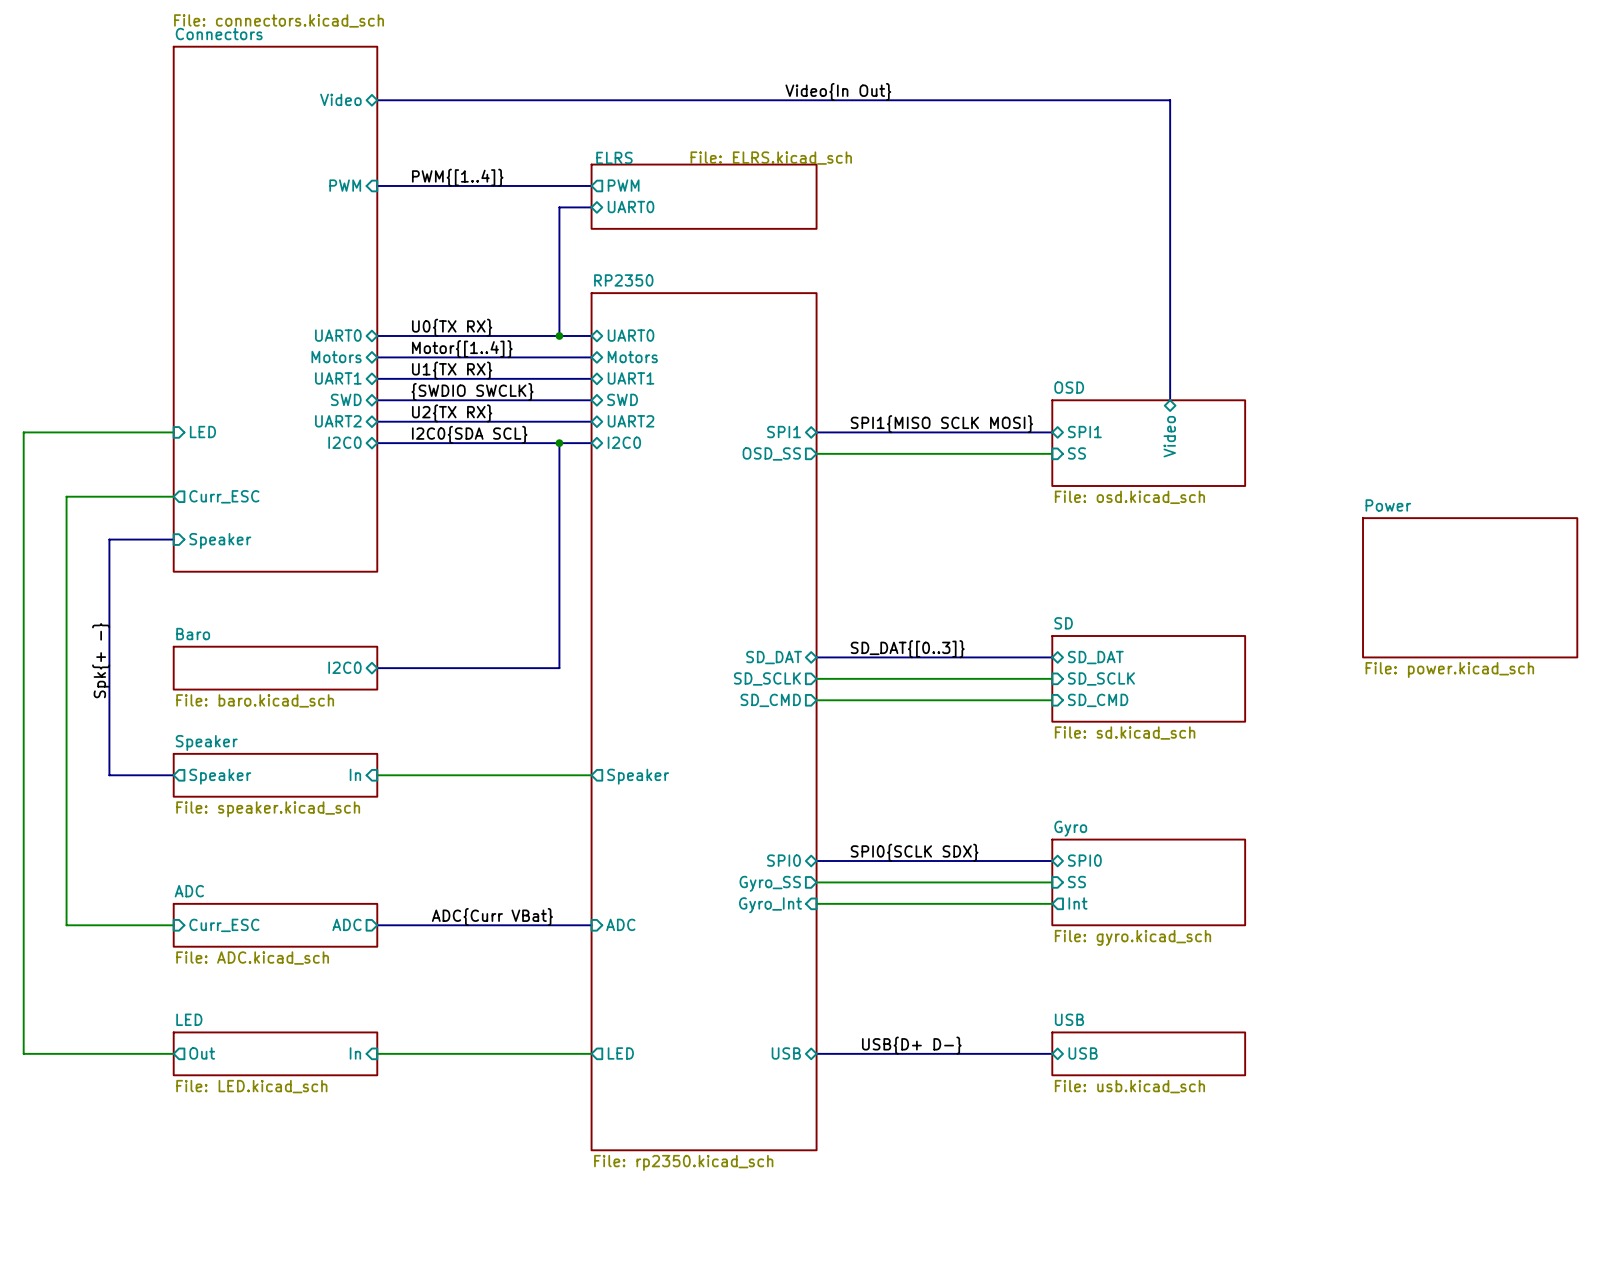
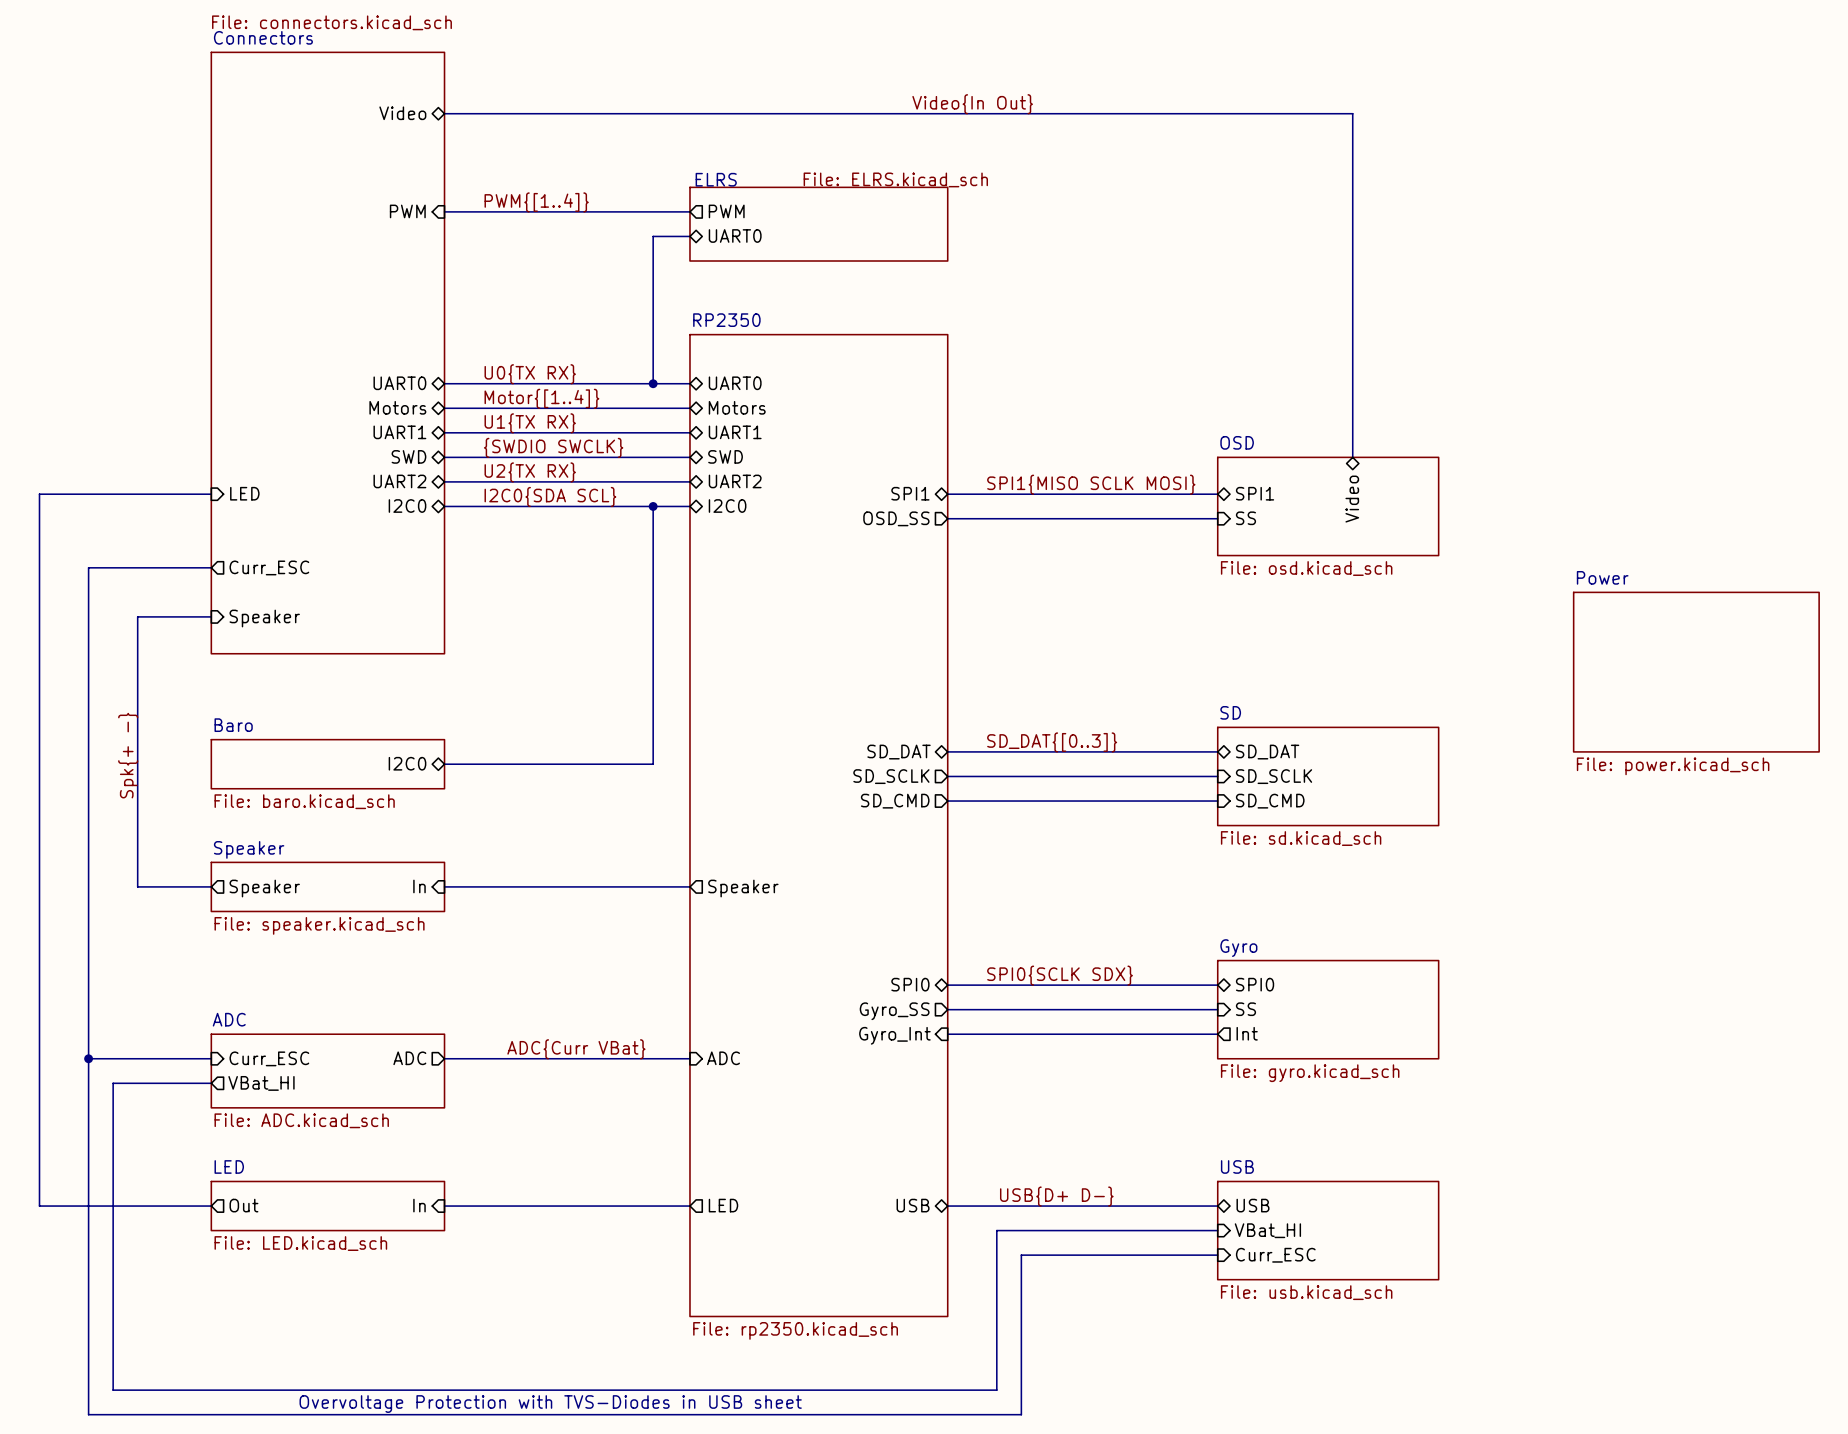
wire: none -> (88, 1058) (88, 1414) (1021, 1414) (1021, 1255) (1217, 1255)
junction: none -> (88, 1058)
sheet ADC: File: ADC.kicad_sch (275, 925) -> none
sheet ADC: none -> File: ADC.kicad_sch (327, 1071)
wire: none -> (211, 1083) (113, 1083) (113, 1390) (996, 1390) (996, 1230) (1217, 1230)
sheet pin: none -> VBat_HI (261, 1083)
sheet USB: File: usb.kicad_sch (1148, 1053) -> none
sheet pin: none -> VBat_HI (1267, 1230)
sheet USB: none -> File: usb.kicad_sch (1328, 1230)
sheet pin: none -> Curr_ESC (1275, 1255)
text: none -> Overvoltage Protection with TVS-Diodes in USB sheet (550, 1404)

